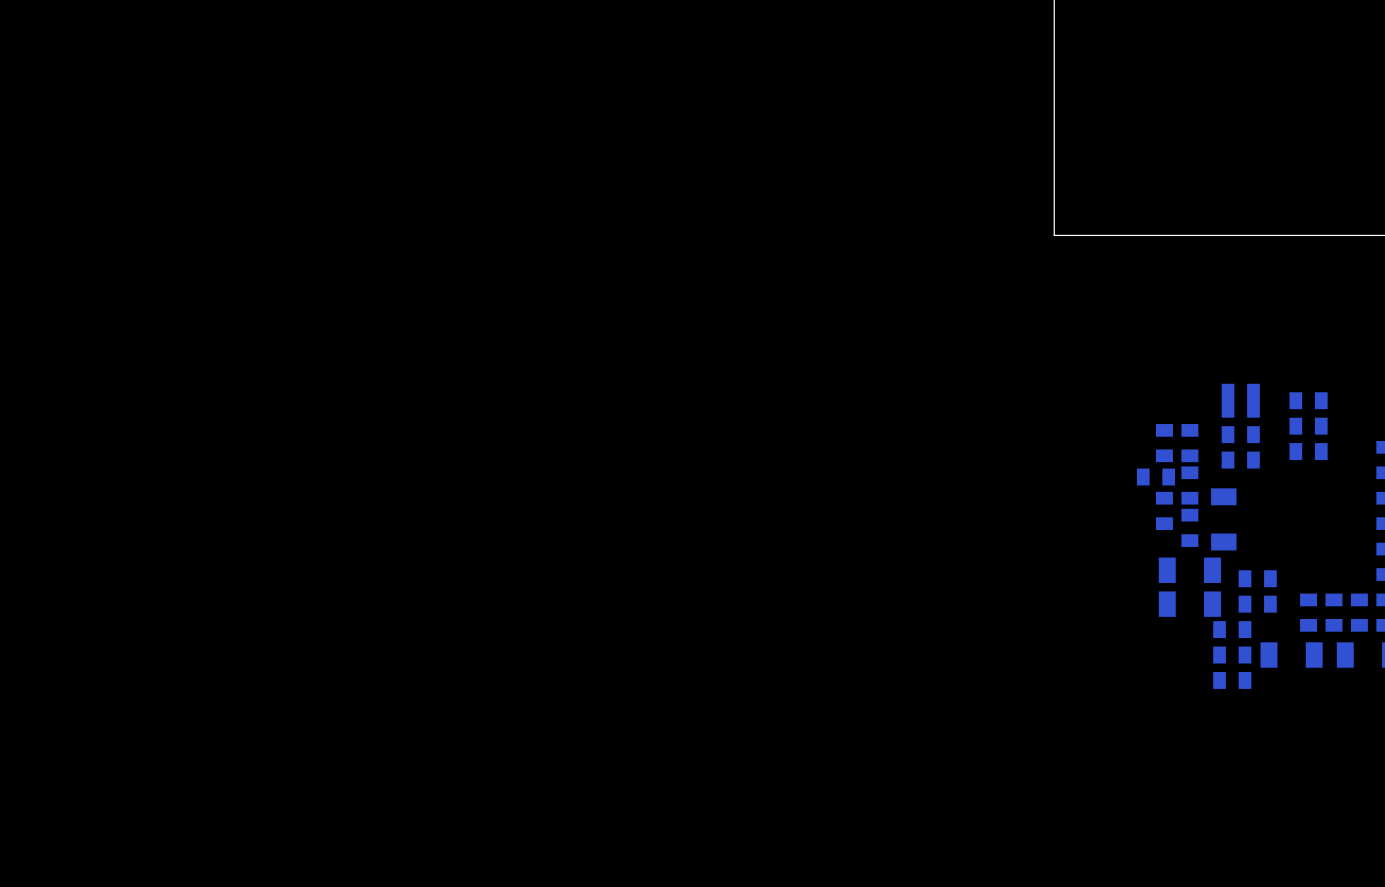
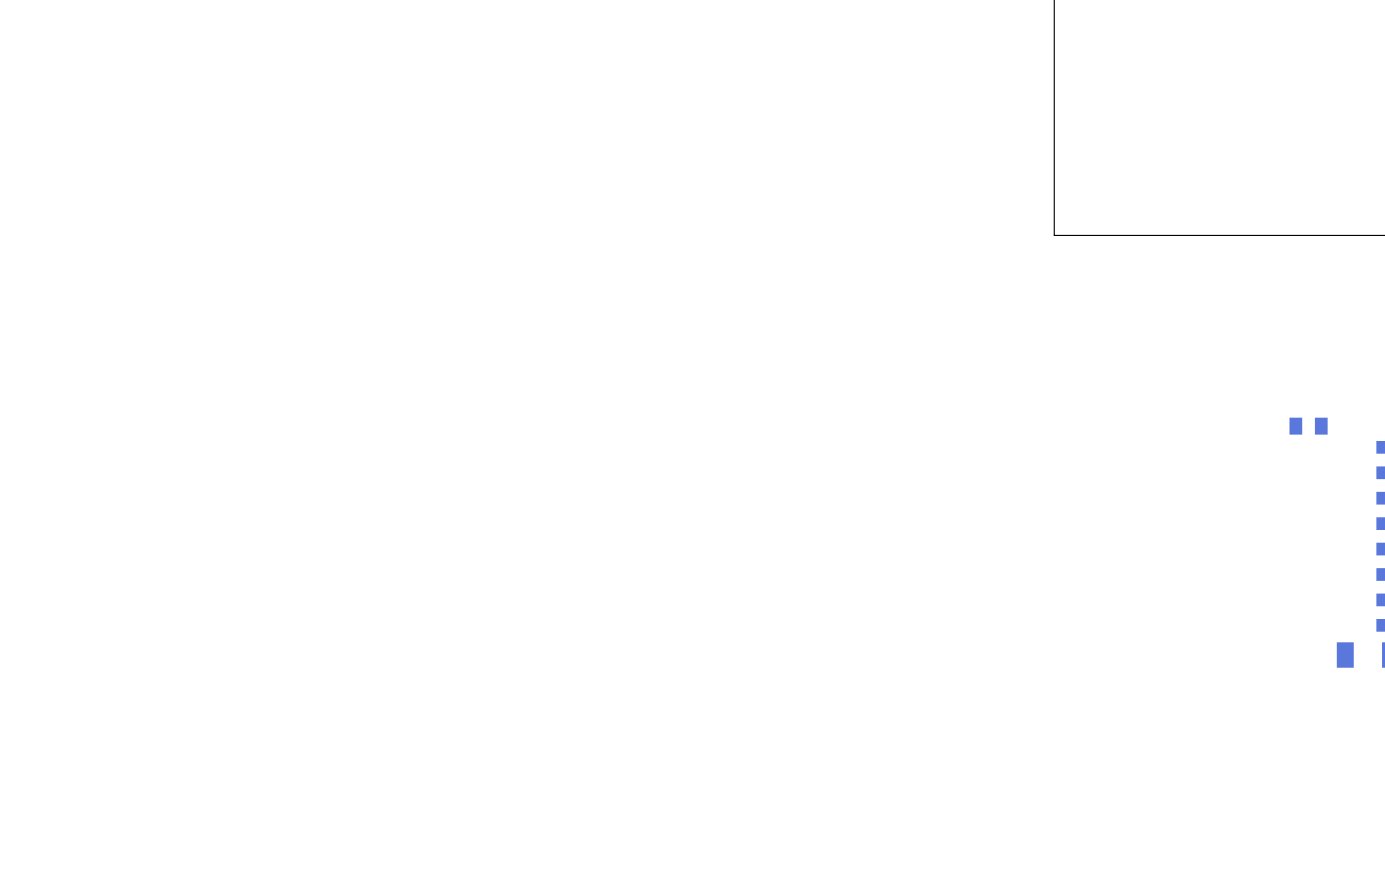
part: (1240, 392) -> none
part: (1308, 400) -> none
part: (1240, 409) -> none
part: (1240, 434) -> none
part: (1164, 443) -> none
part: (1189, 443) -> none
part: (1308, 451) -> none
part: (1240, 460) -> none
part: (1155, 477) -> none
part: (1189, 485) -> none
part: (1164, 510) -> none
part: (1223, 519) -> none
part: (1189, 527) -> none
part: (1189, 570) -> none
part: (1257, 578) -> none
part: (1189, 604) -> none
part: (1257, 604) -> none
part: (1308, 612) -> none
part: (1333, 612) -> none
part: (1359, 612) -> none
part: (1232, 629) -> none
part: (1232, 655) -> none
part: (1291, 655) -> none
part: (1232, 680) -> none

